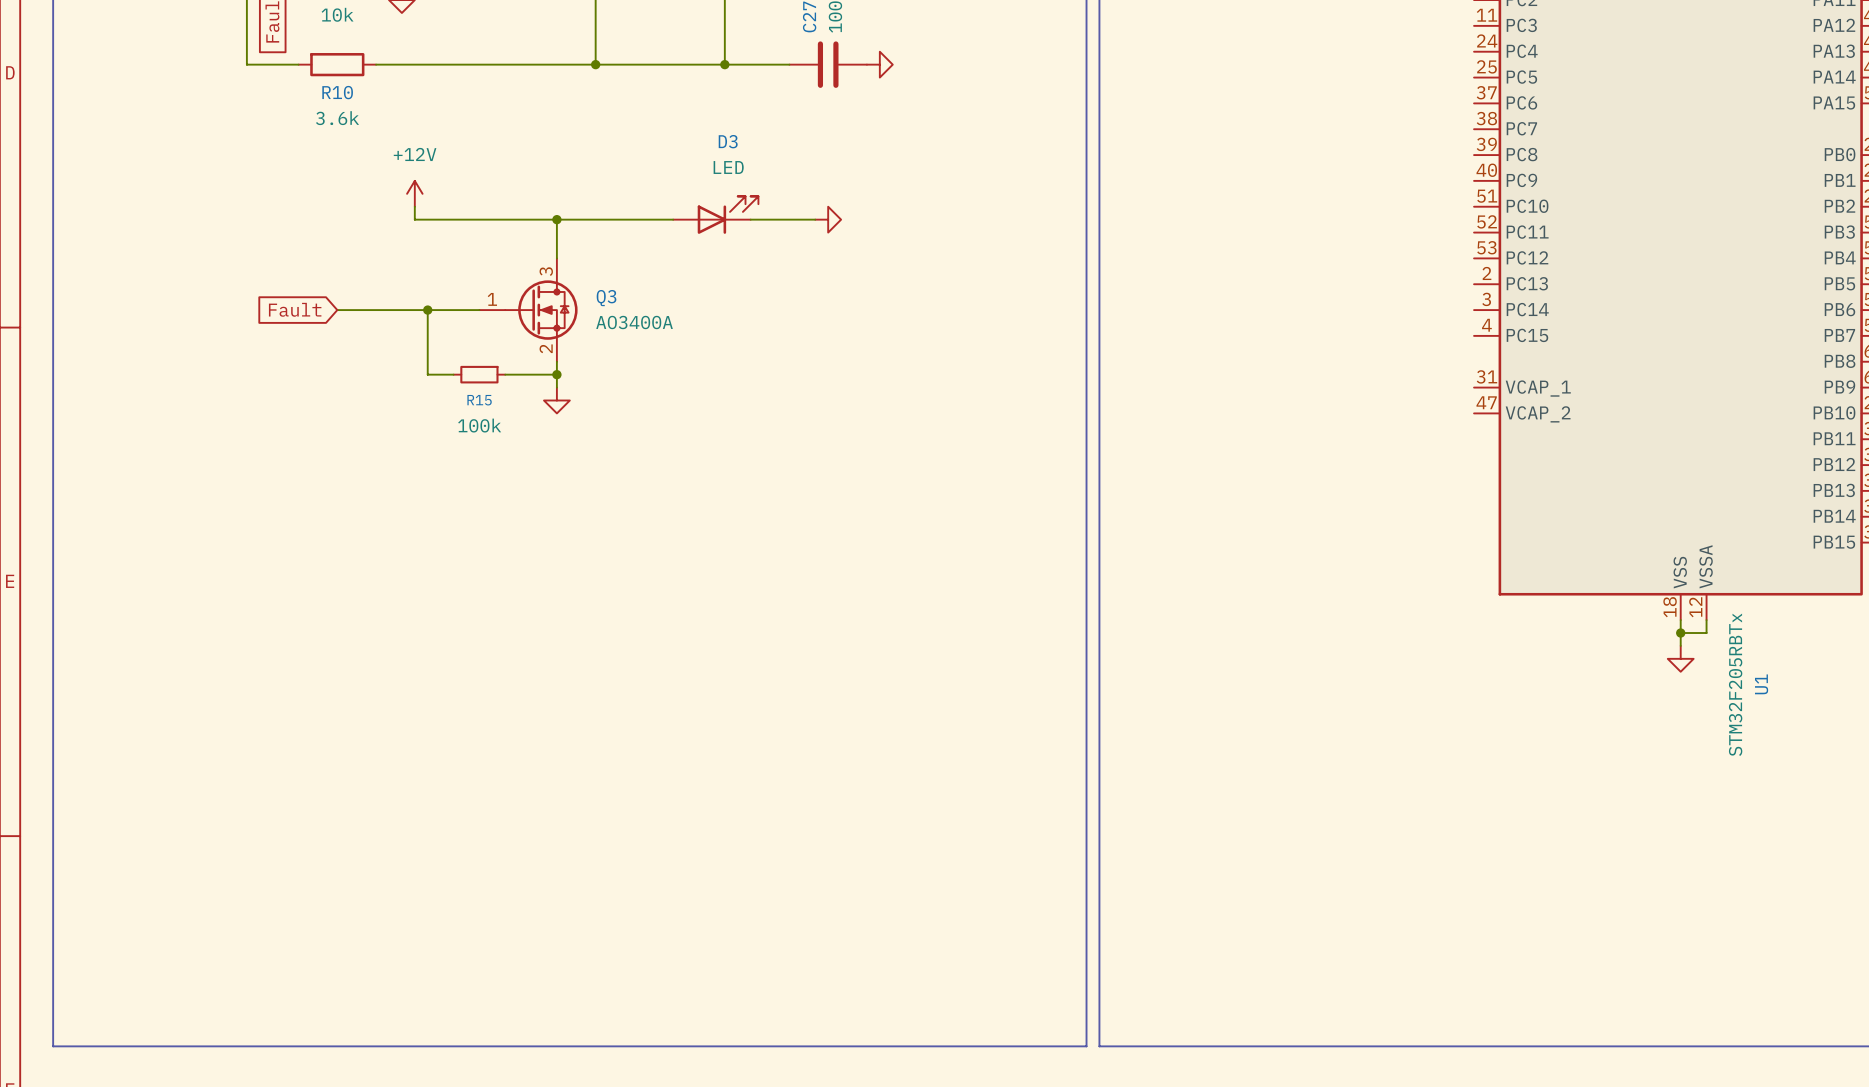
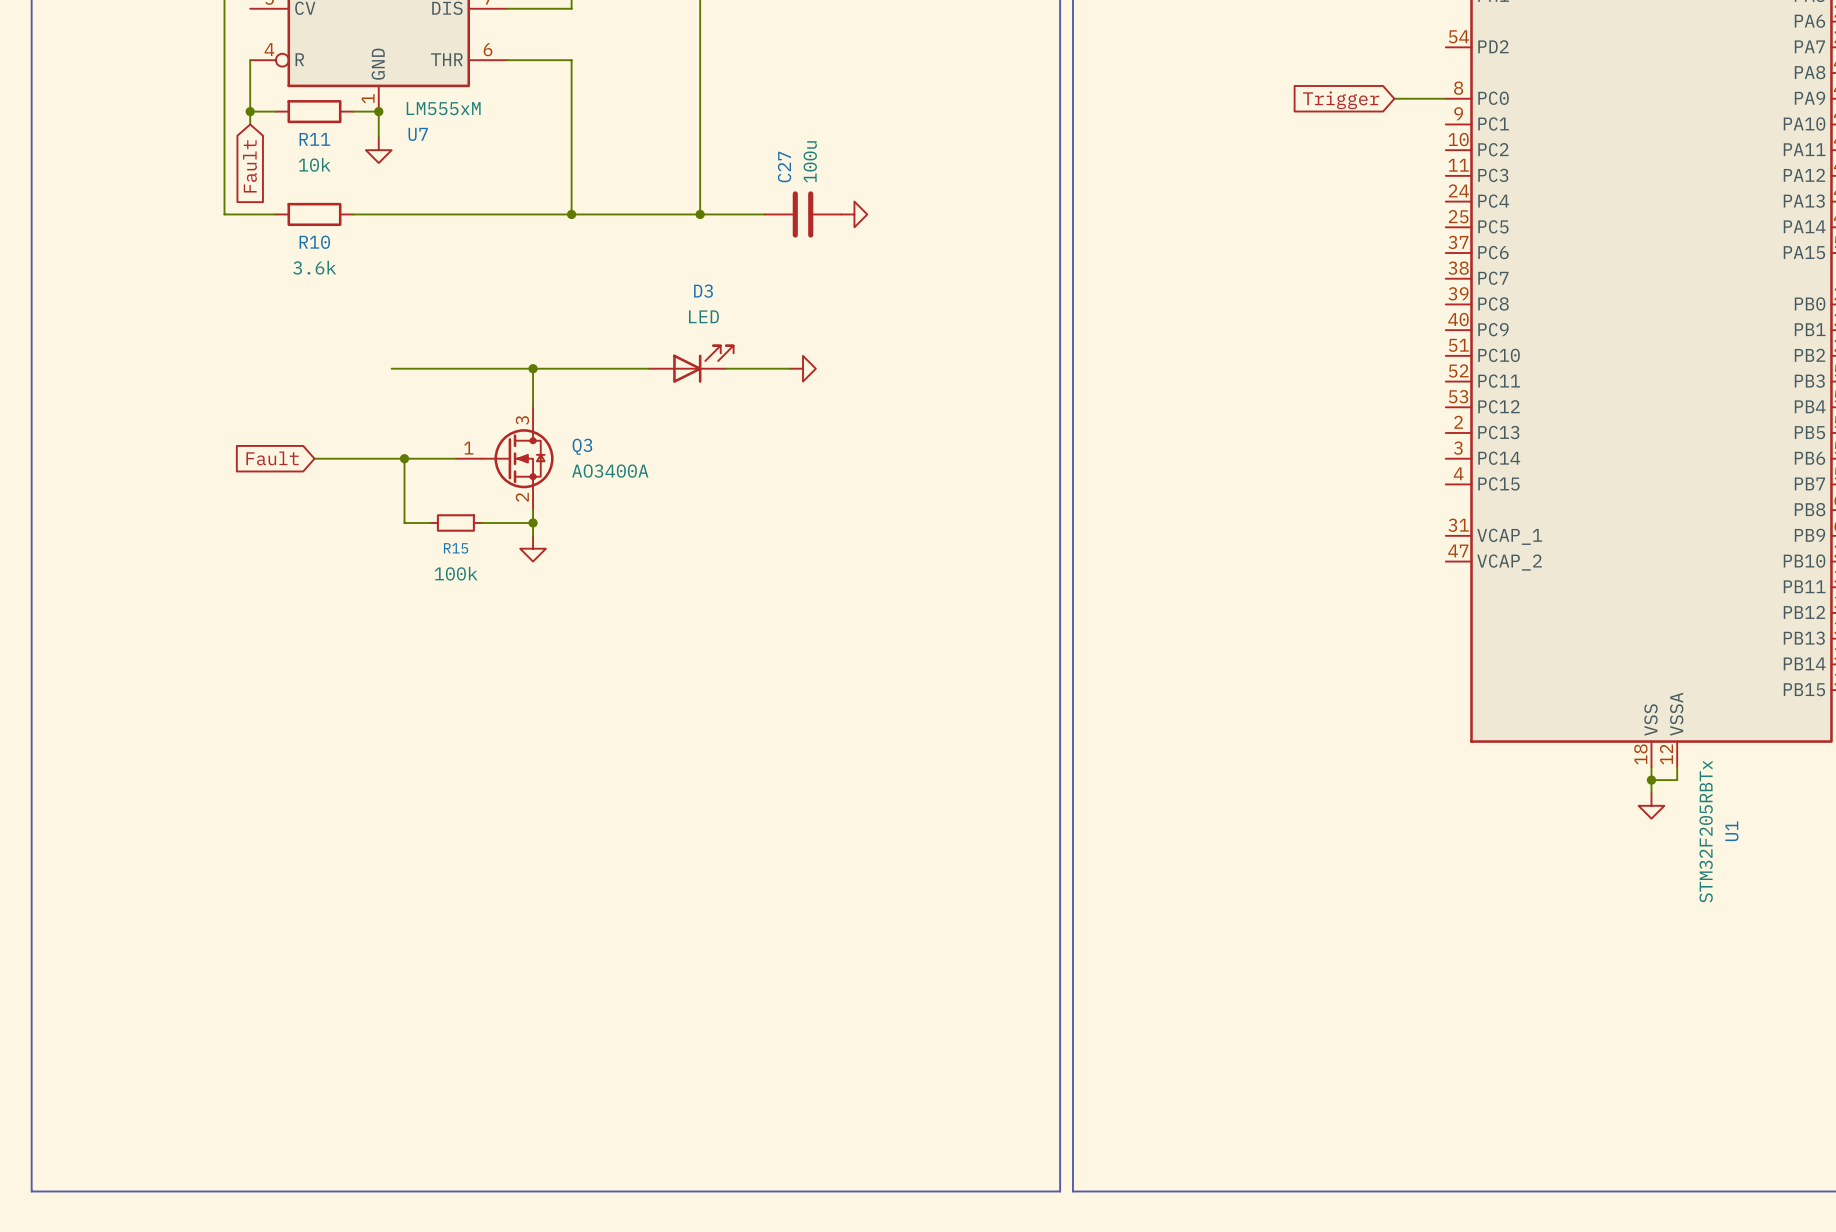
power symbol: +12V (414, 193) -> none
wire: (414, 206) (414, 219) -> none

